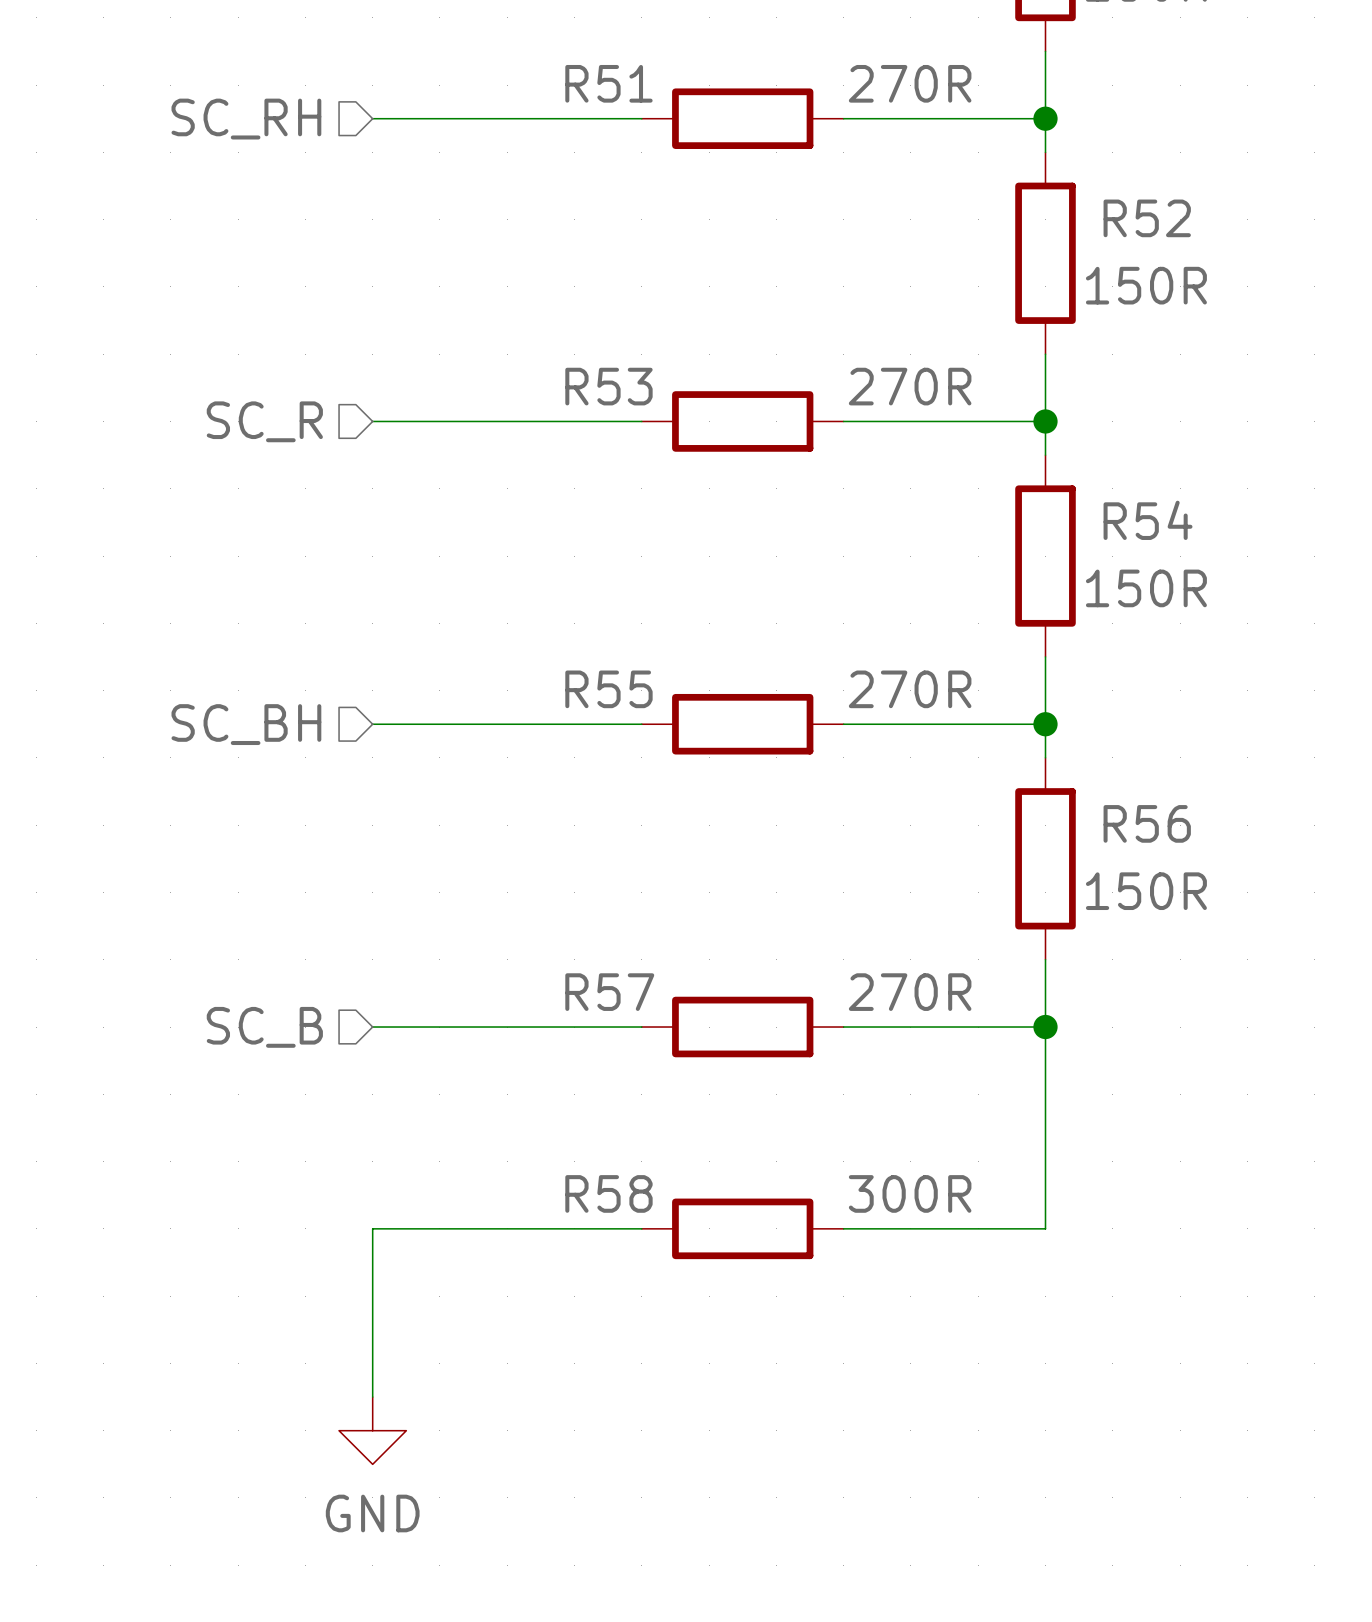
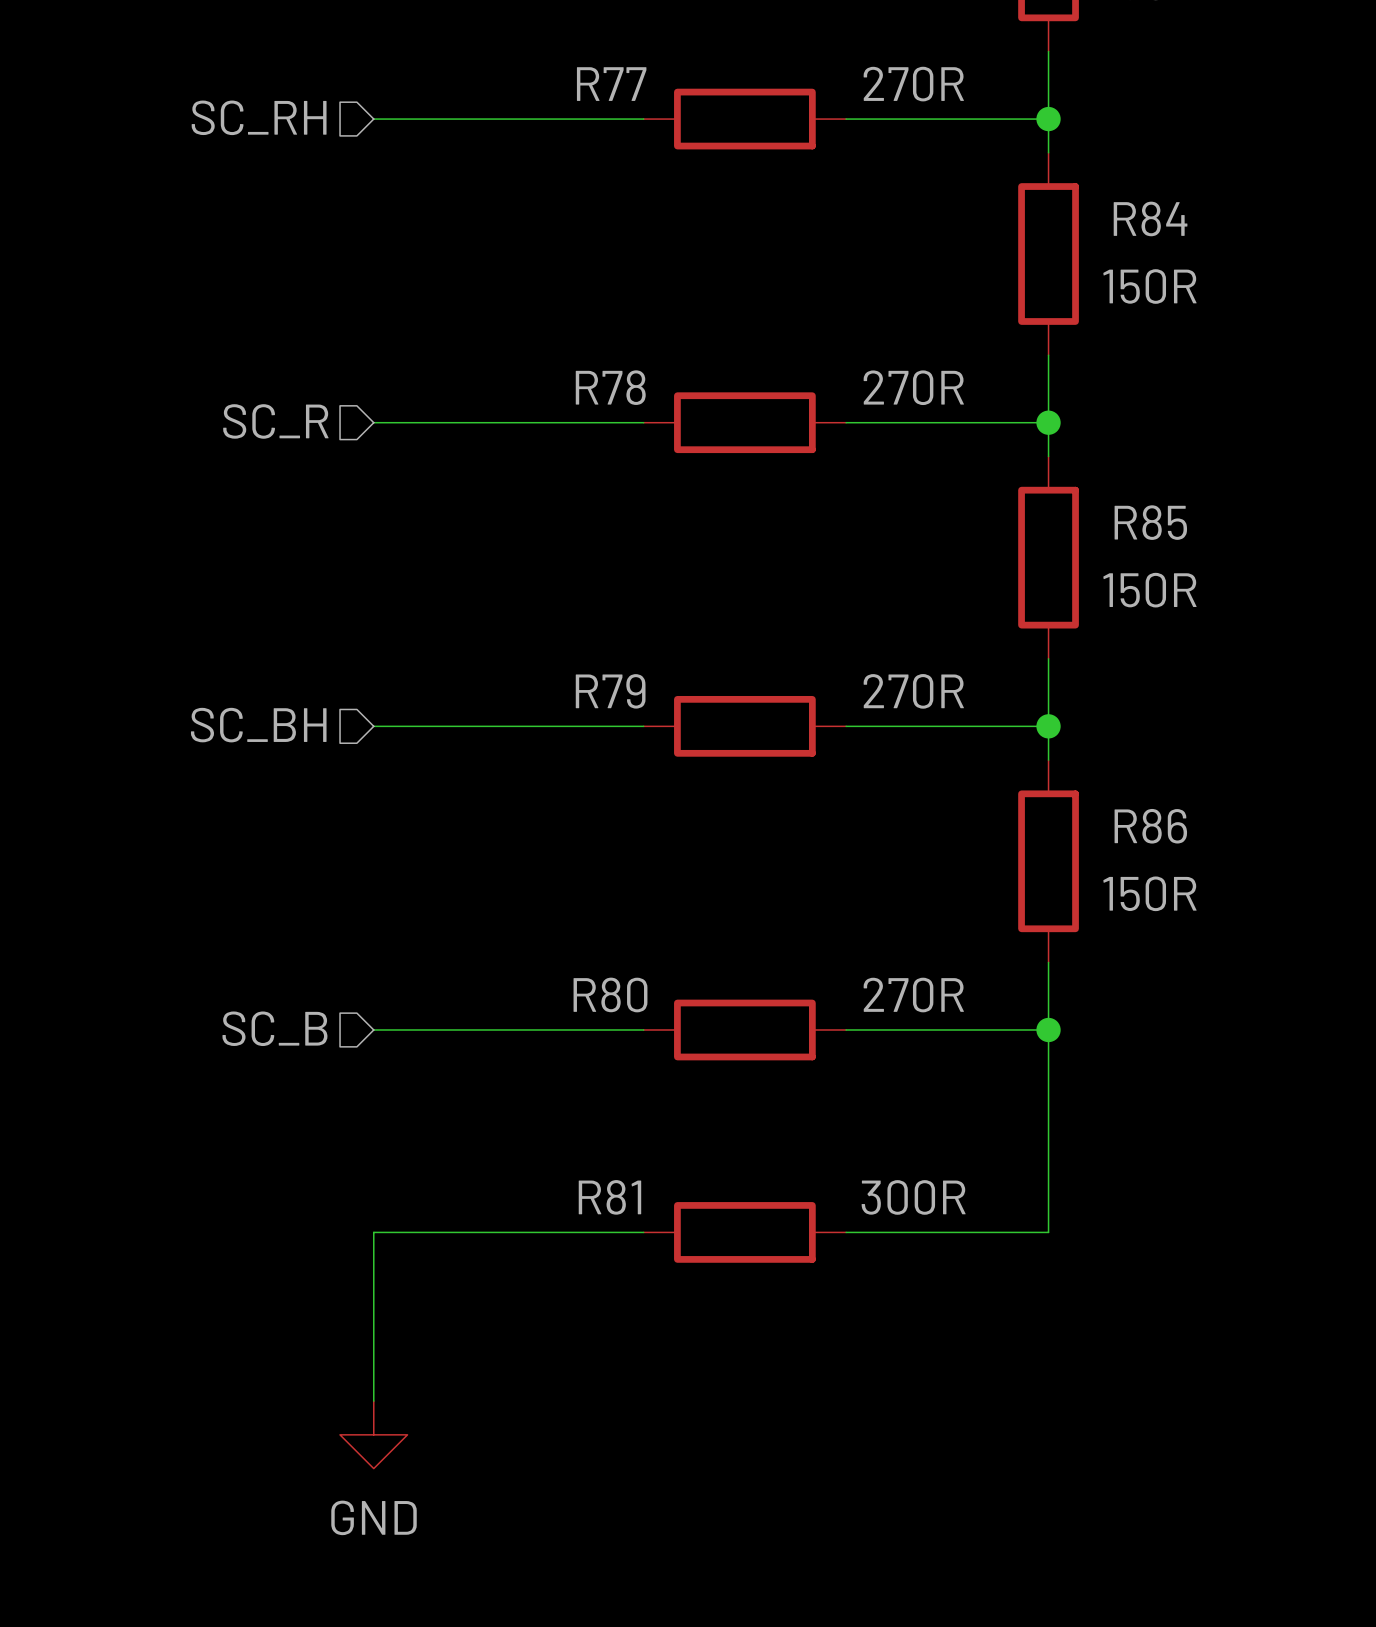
R51 name: R51 (608, 83) -> R77 (611, 84)
R52 name: R52 (1147, 218) -> R84 (1150, 218)
R53 name: R53 (608, 386) -> R78 (610, 387)
R54 name: R54 (1148, 520) -> R85 (1150, 522)
R55 name: R55 (608, 689) -> R79 (610, 691)
R56 name: R56 (1147, 823) -> R86 (1150, 826)
R57 name: R57 (609, 992) -> R80 (610, 994)
R58 name: R58 (608, 1193) -> R81 (609, 1197)

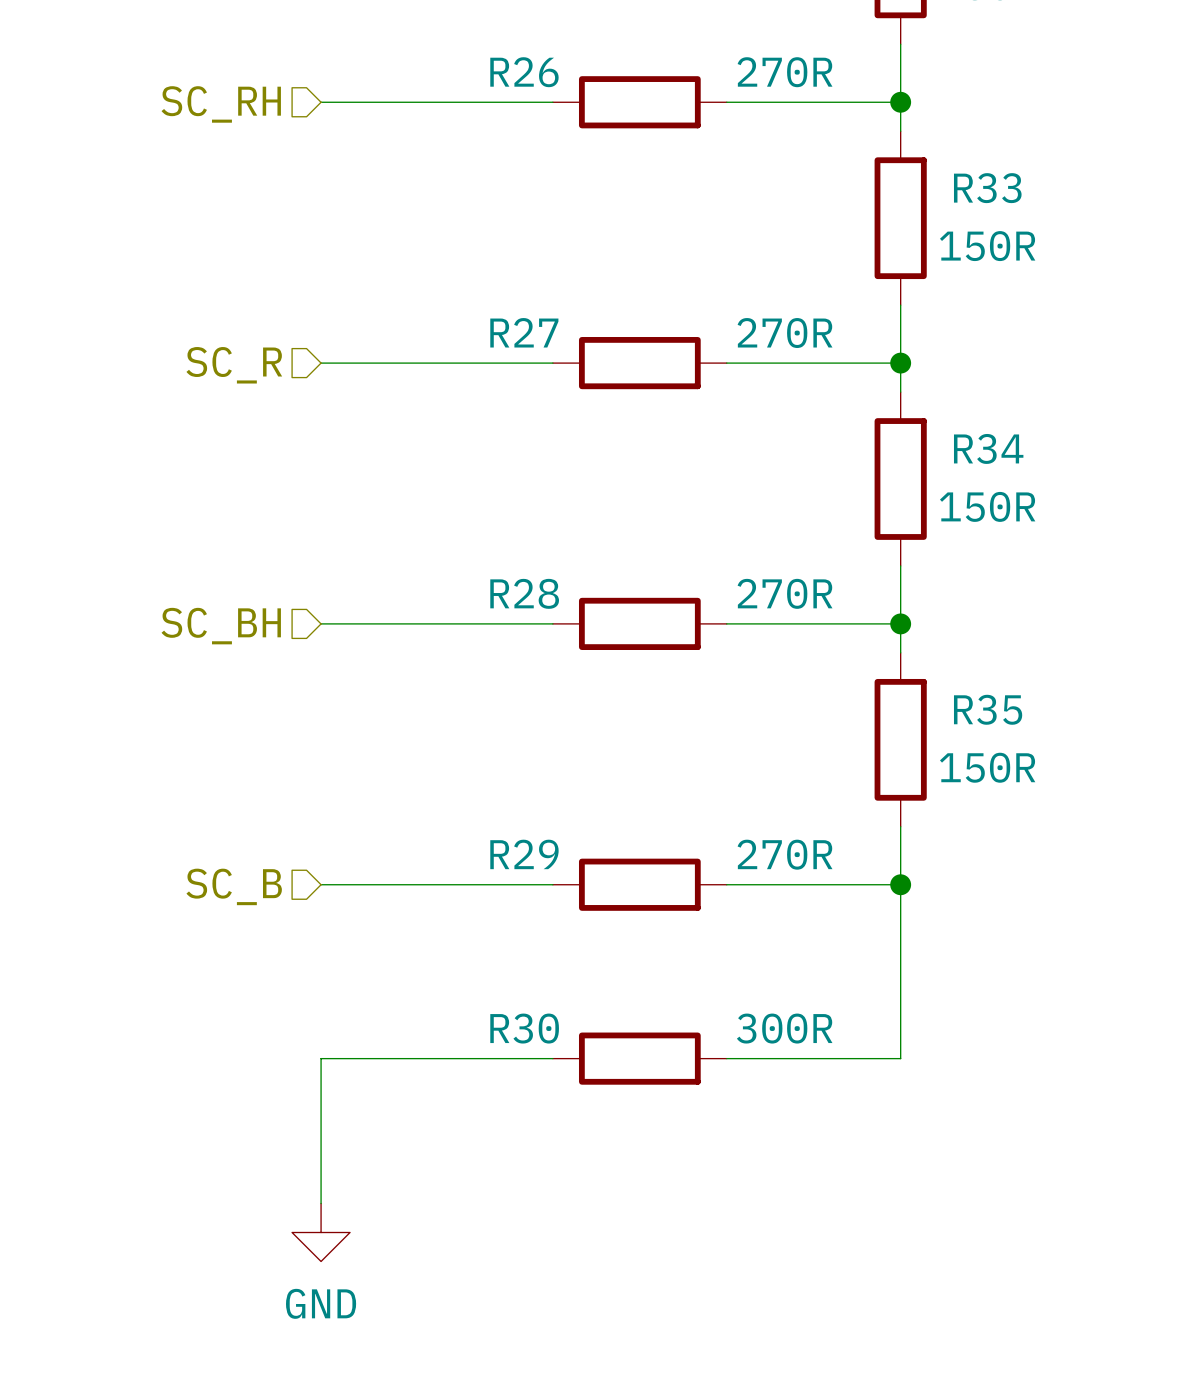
R77 name: R77 (611, 84) -> R26 (524, 72)
R84 name: R84 (1150, 218) -> R33 (987, 188)
R78 name: R78 (610, 387) -> R27 (524, 332)
R85 name: R85 (1150, 522) -> R34 (988, 448)
R79 name: R79 (610, 691) -> R28 (524, 593)
R86 name: R86 (1150, 826) -> R35 (988, 709)
R80 name: R80 (610, 994) -> R29 (524, 854)
R81 name: R81 (609, 1197) -> R30 (524, 1028)

